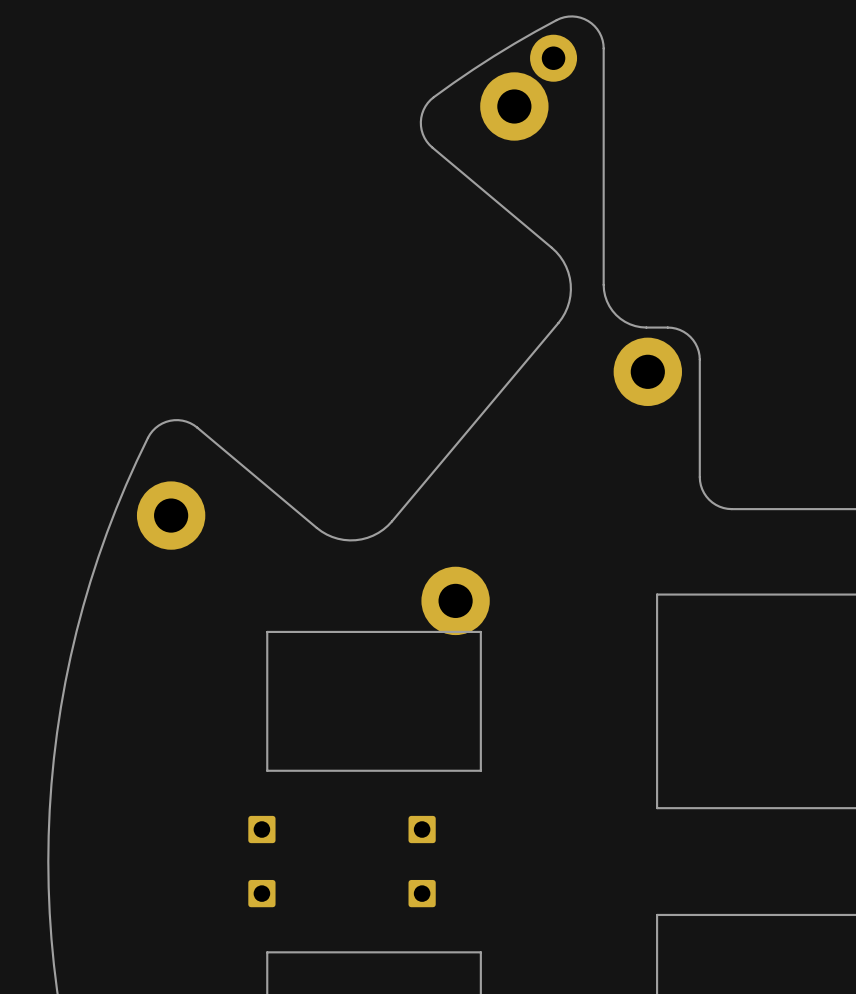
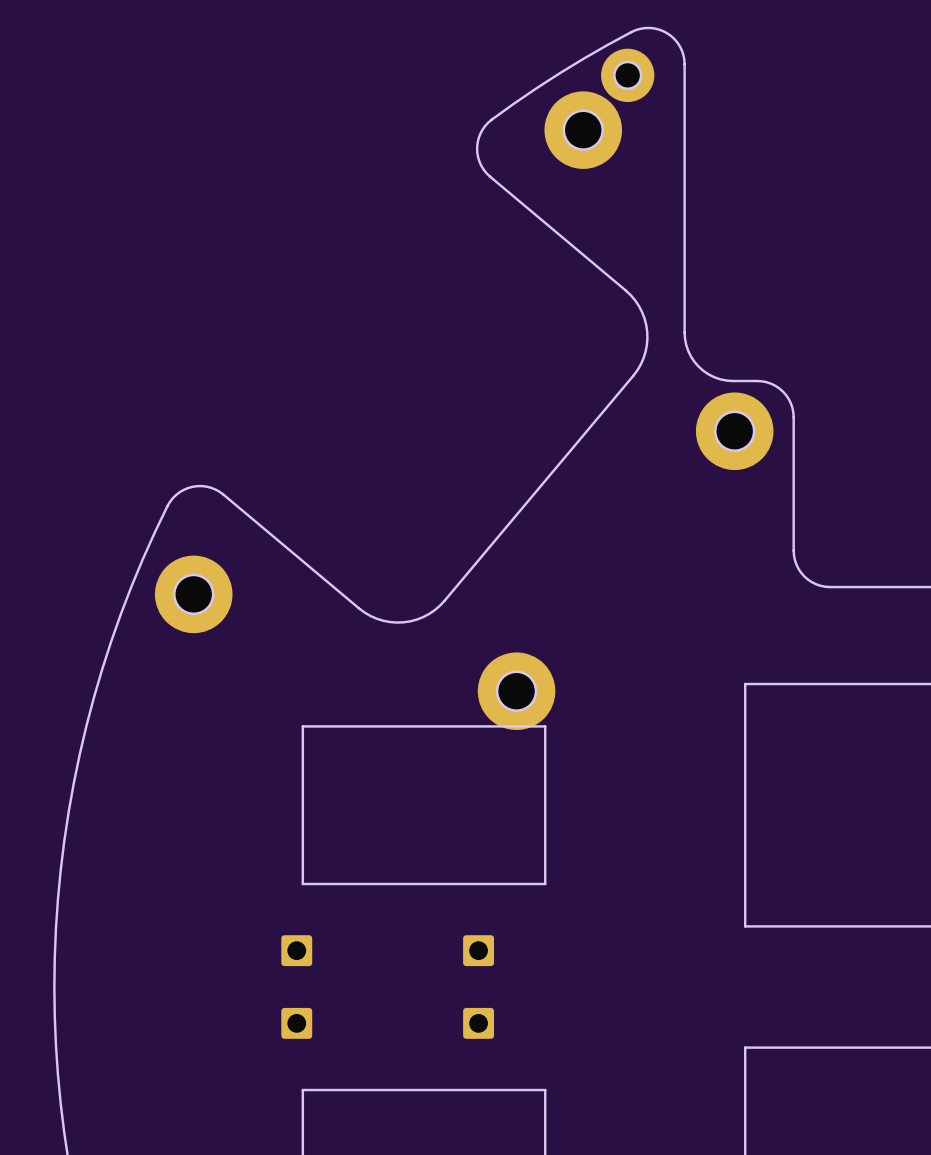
round board edge: none -> [613, 60, 643, 90]
round board edge: none -> [562, 109, 604, 151]
round board edge: none -> [714, 410, 756, 452]
round board edge: none -> [173, 573, 215, 615]
round board edge: none -> [495, 670, 538, 712]

